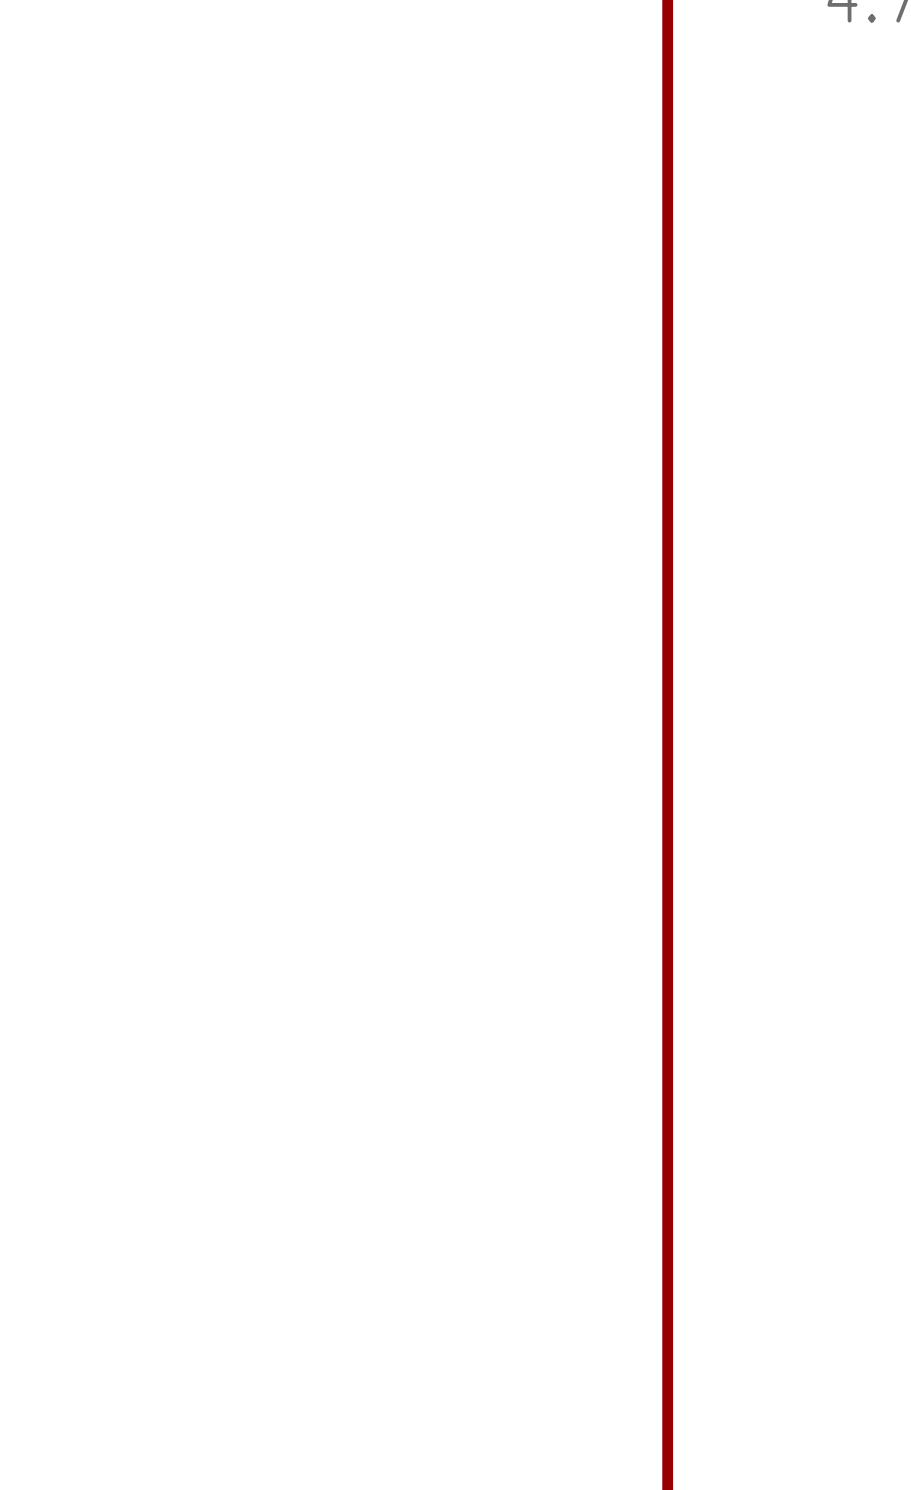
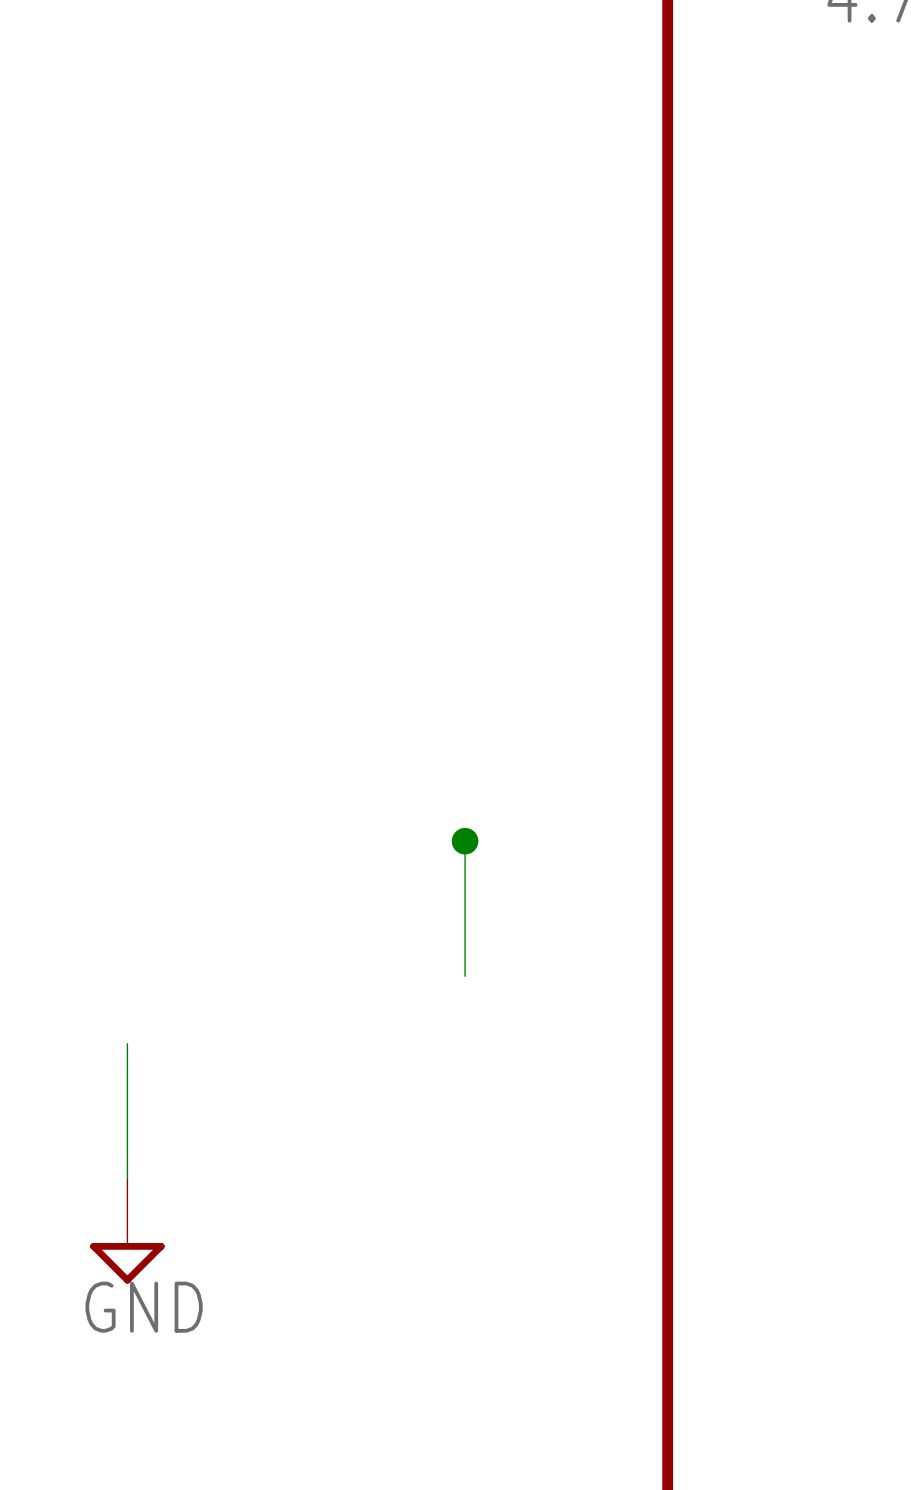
wire: none -> (465, 841) (465, 976)
junction: none -> (465, 841)
wire: none -> (127, 1043) (127, 1178)
power symbol: none -> GND (127, 1231)

